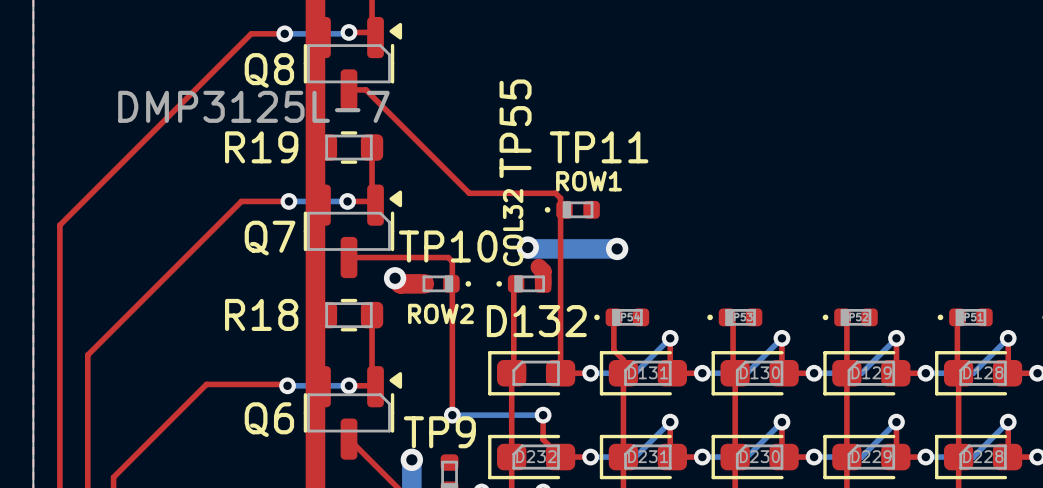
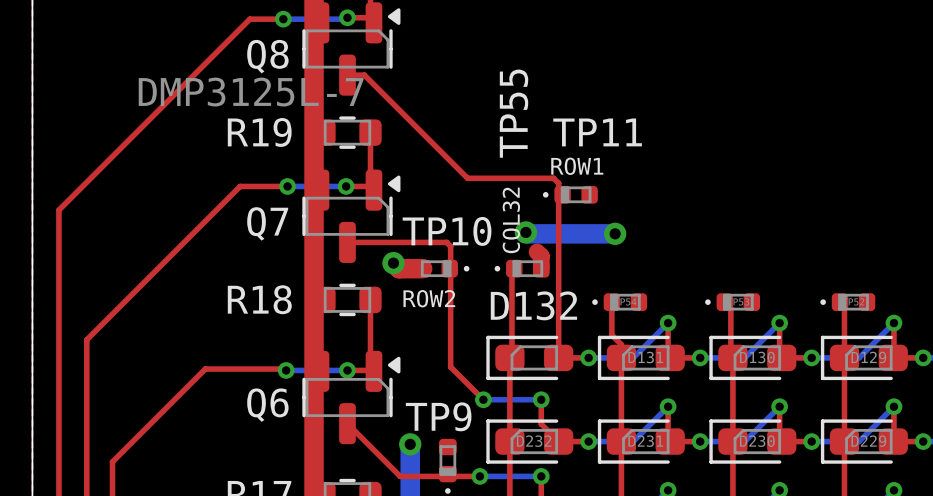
top track: (452, 382) (452, 415) -> (450, 366) (483, 399)
bottom track: (452, 415) (485, 415) -> none
via position: (452, 415) -> (483, 399)

